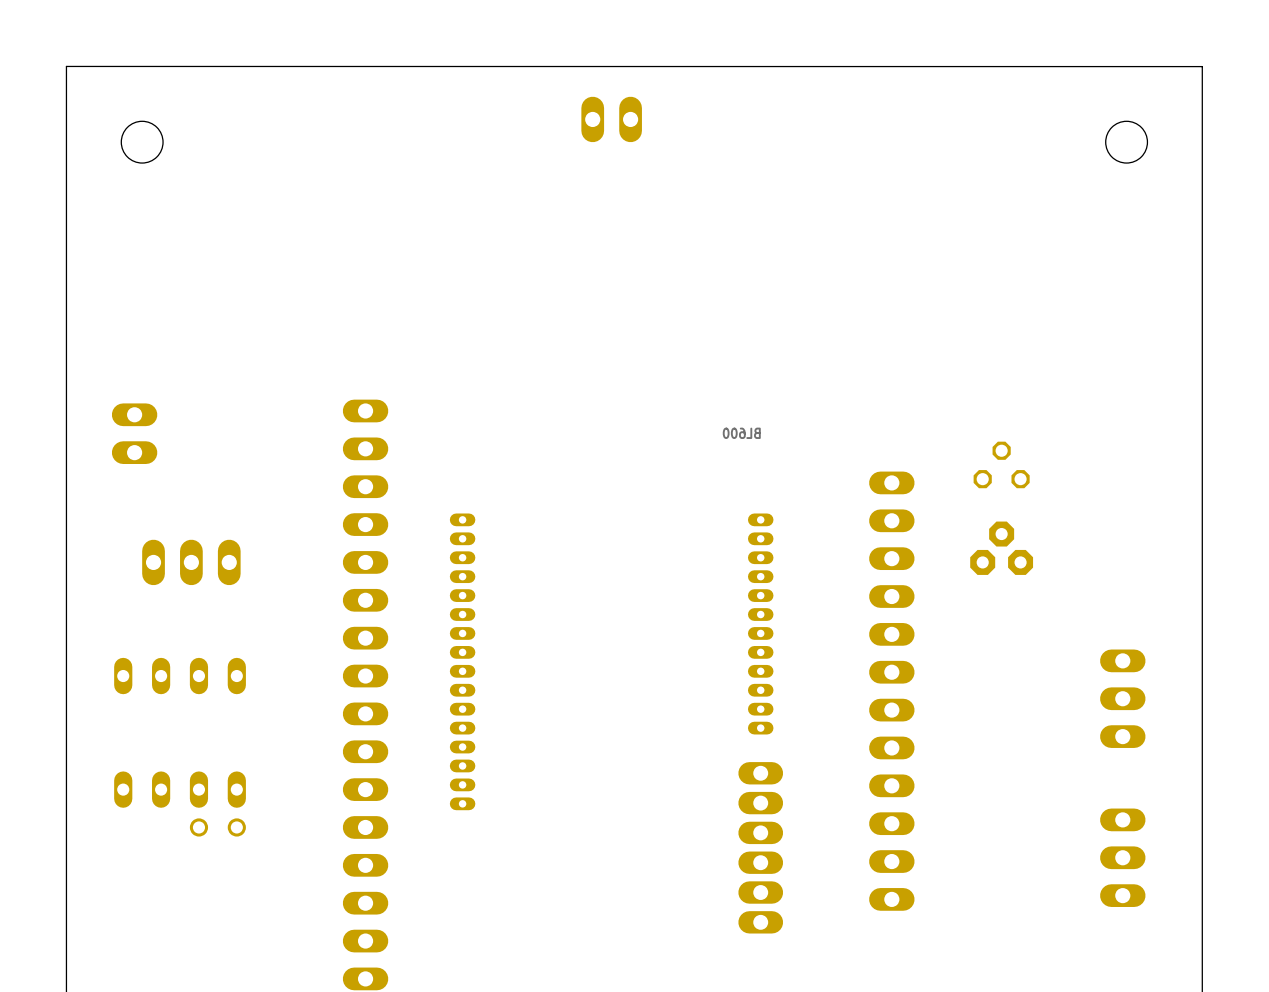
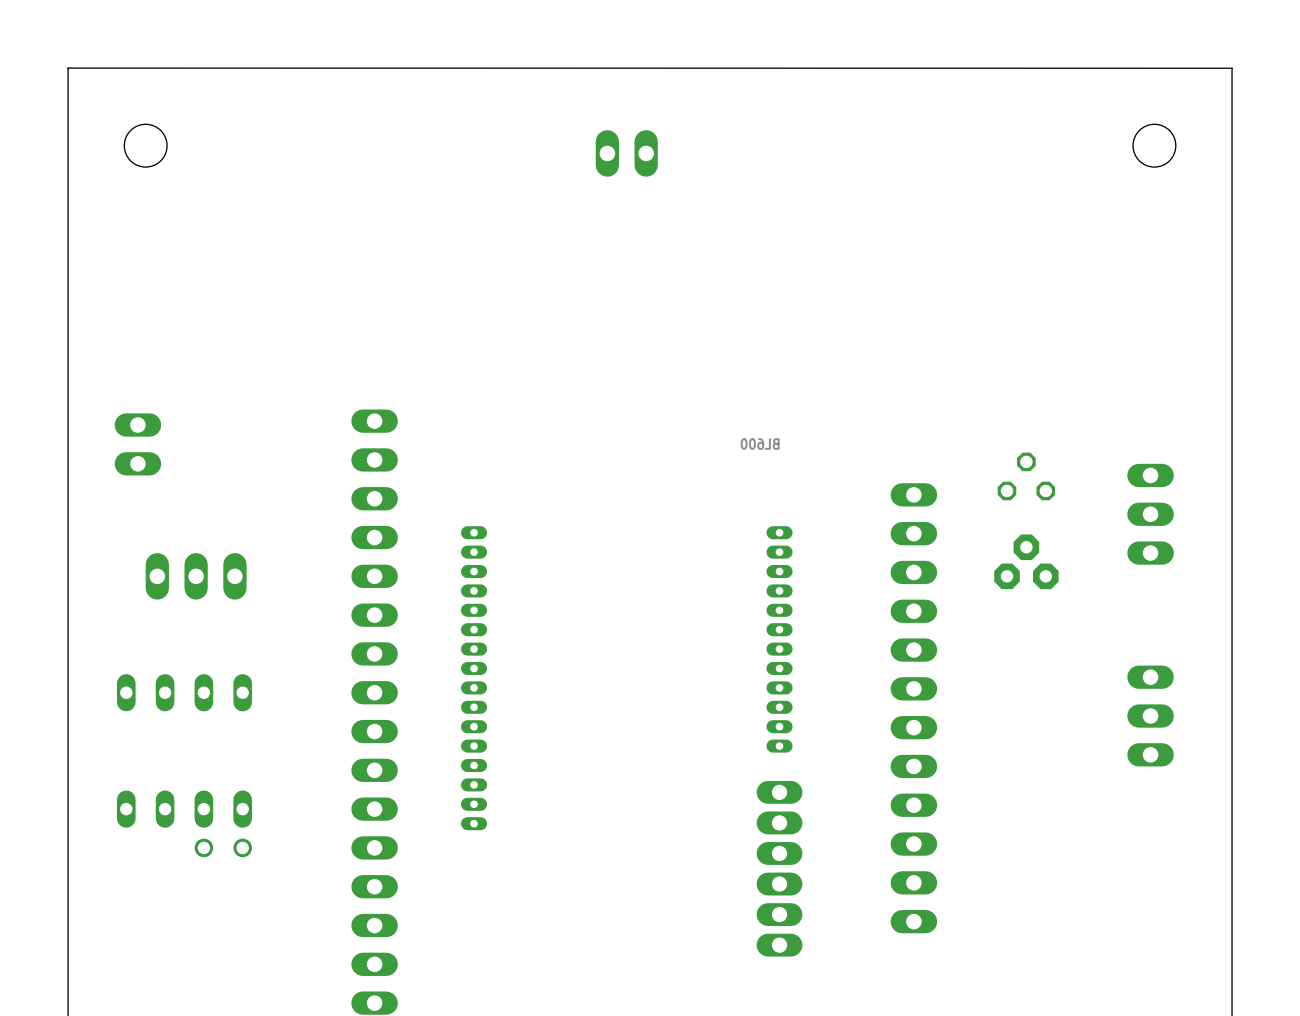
part position: (611, 119) -> (626, 153)
part position: (1122, 857) -> (1150, 514)

